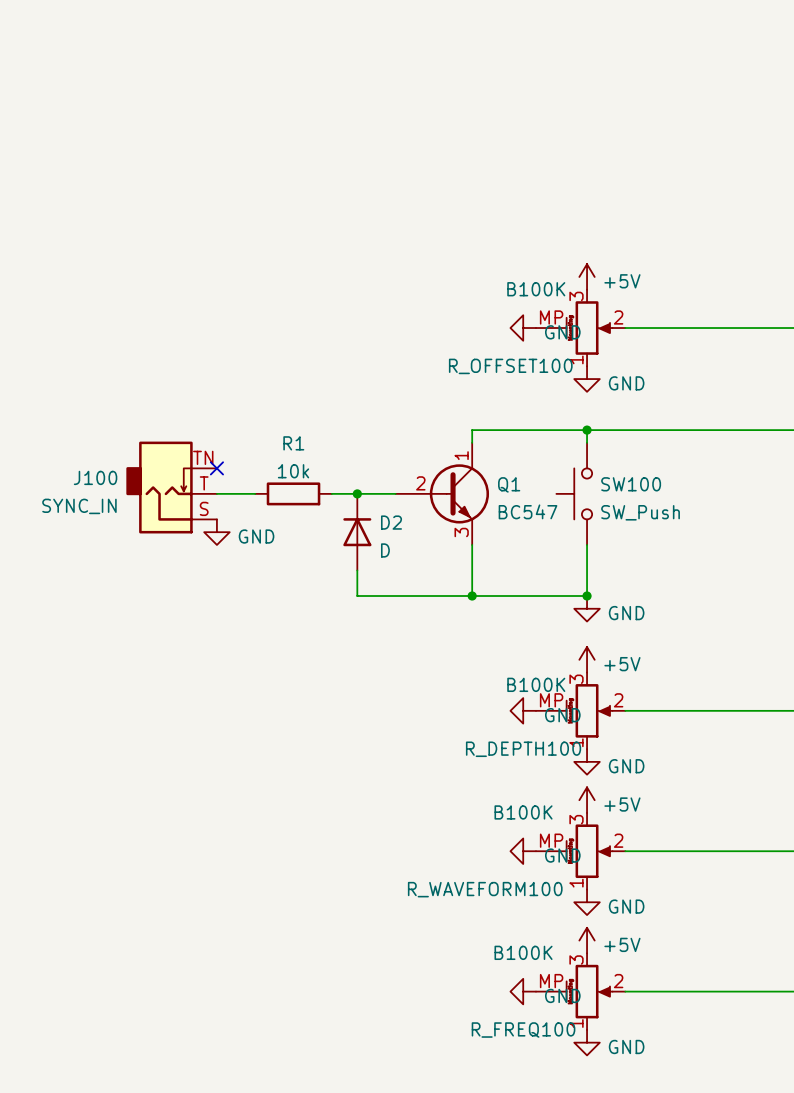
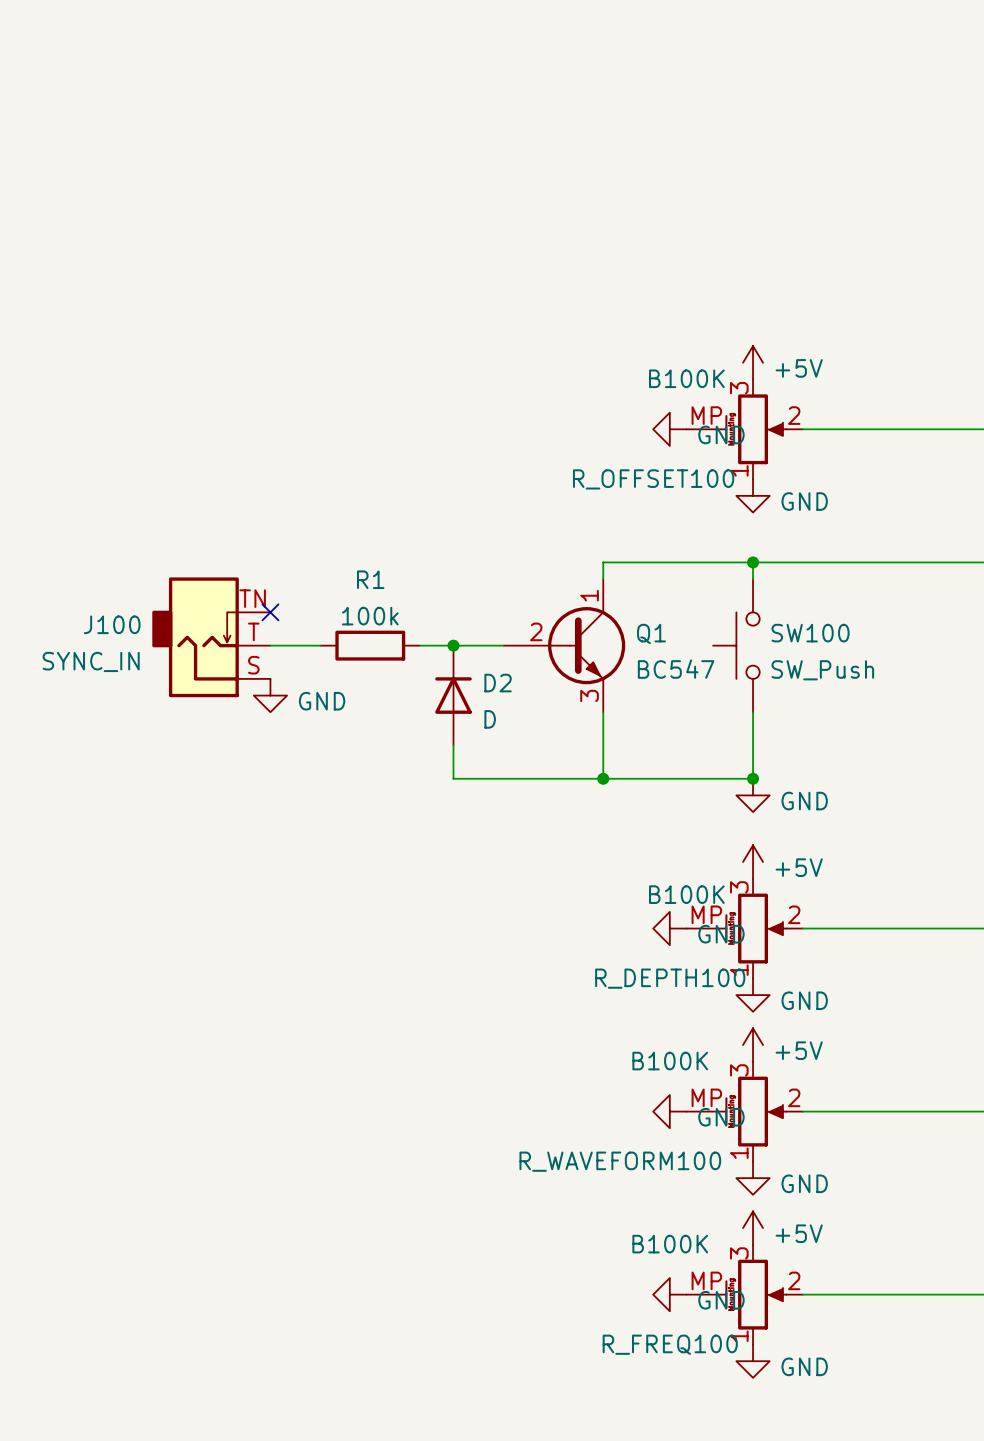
R1 value: 10k (293, 471) -> 100k (370, 616)

